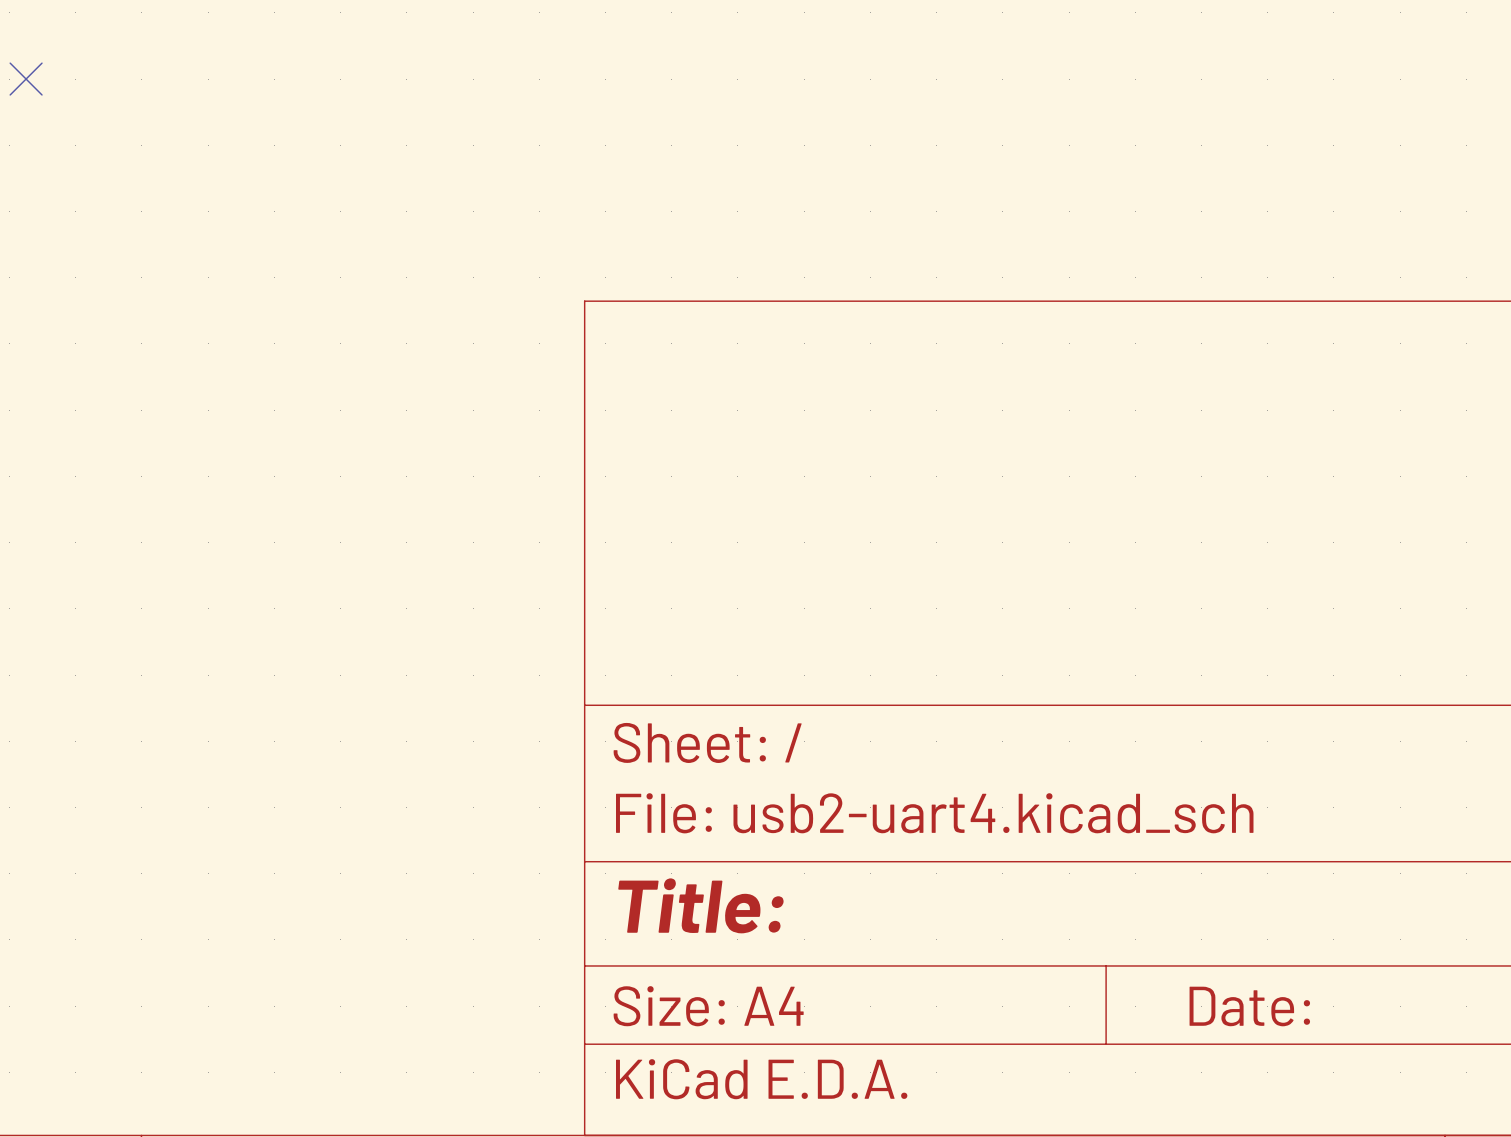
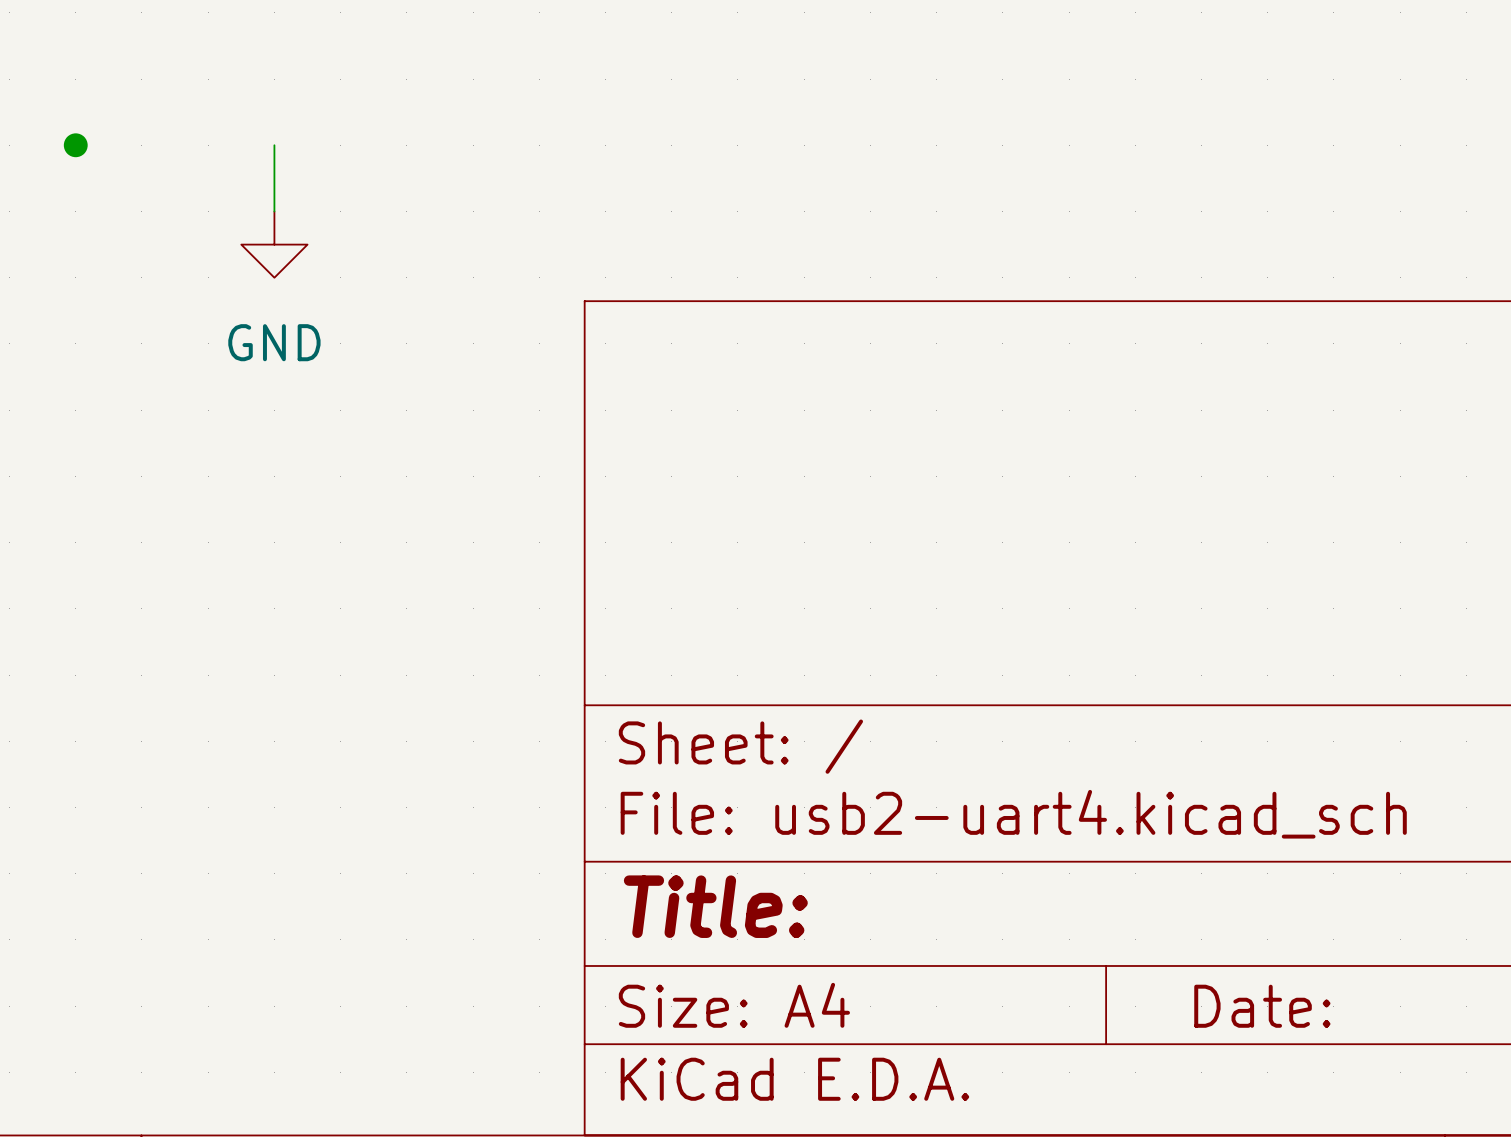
no-connect mark: (26, 79) -> none
junction: none -> (75, 145)
wire: none -> (274, 145) (274, 211)
power symbol: none -> GND (274, 244)

